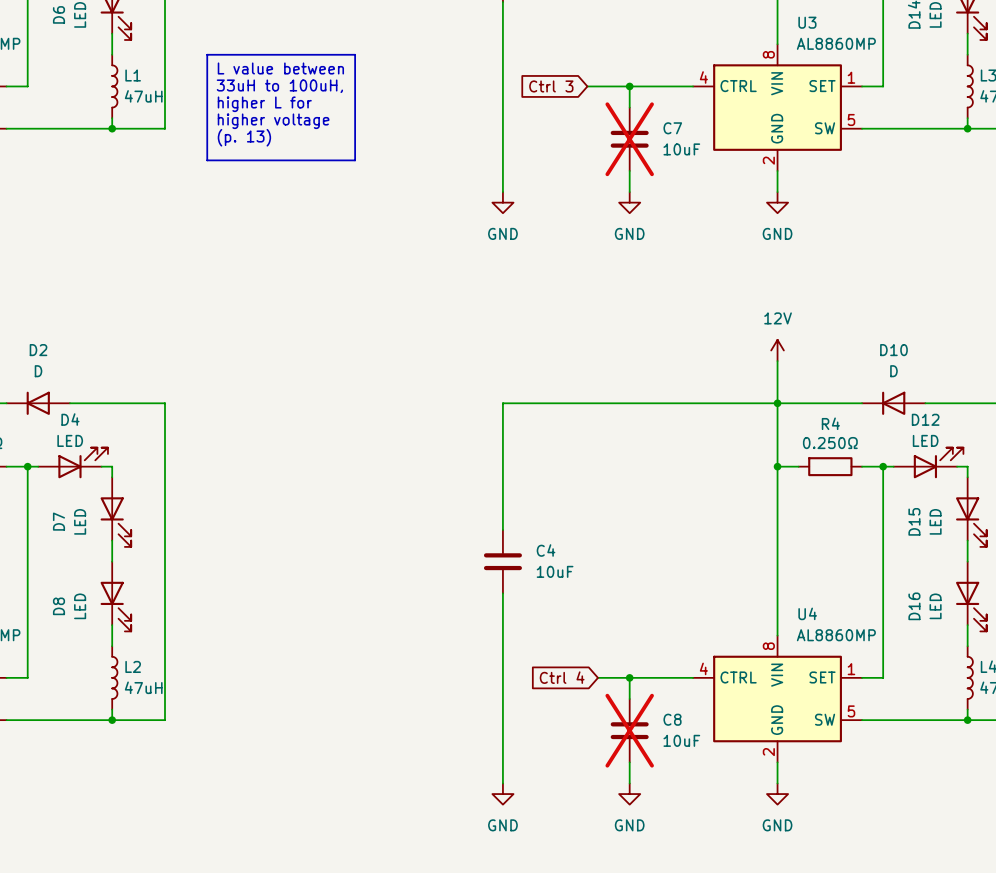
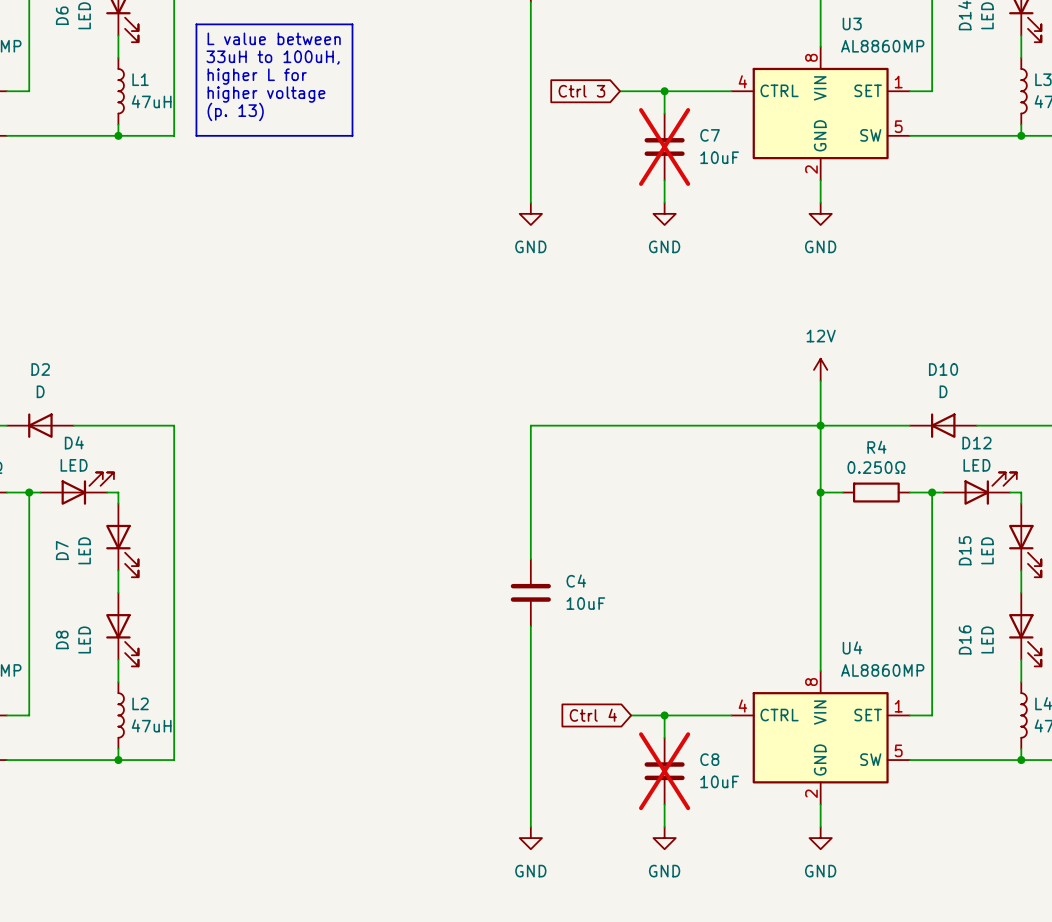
line: (207, 54) (355, 54) (355, 160) (207, 160) (207, 54) -> (196, 24) (352, 24) (352, 135) (196, 135) (196, 24)
text position: L value between (280, 68) -> L value between (274, 38)
text position: 33uH to 100uH, (279, 86) -> 33uH to 100uH, (273, 57)
text position: higher L for (264, 104) -> higher L for (257, 76)
text position: higher voltage (273, 121) -> higher voltage (266, 94)
text position: (p. 13) (244, 137) -> (p. 13) (235, 111)

